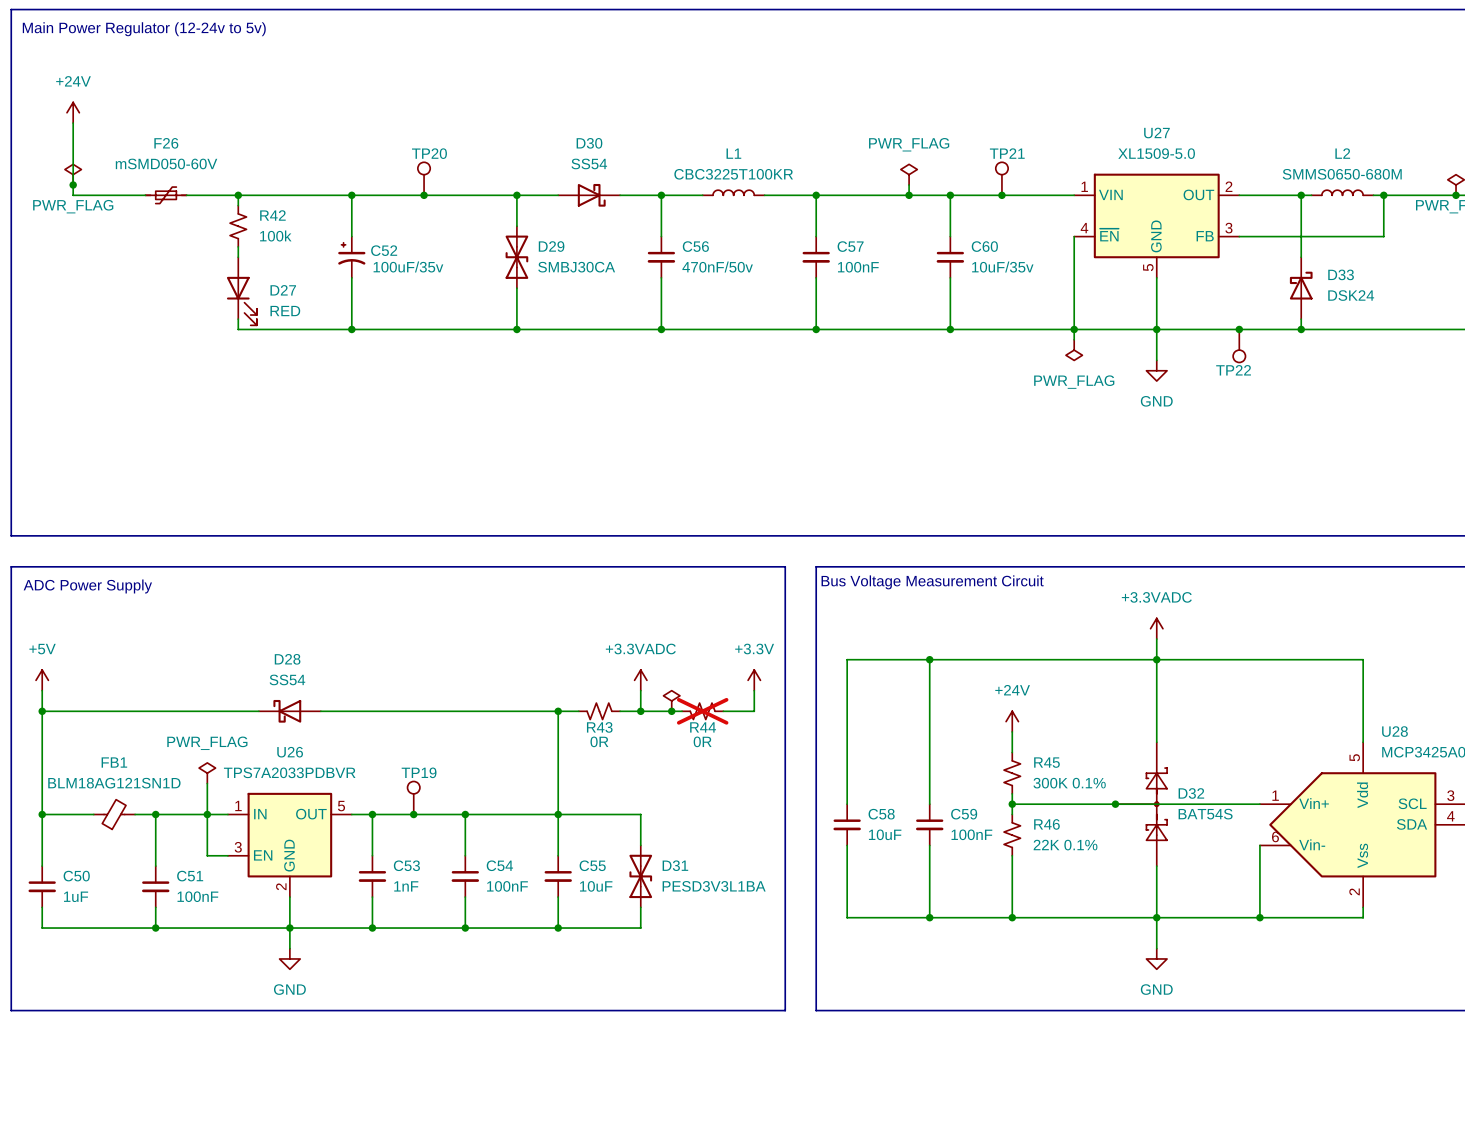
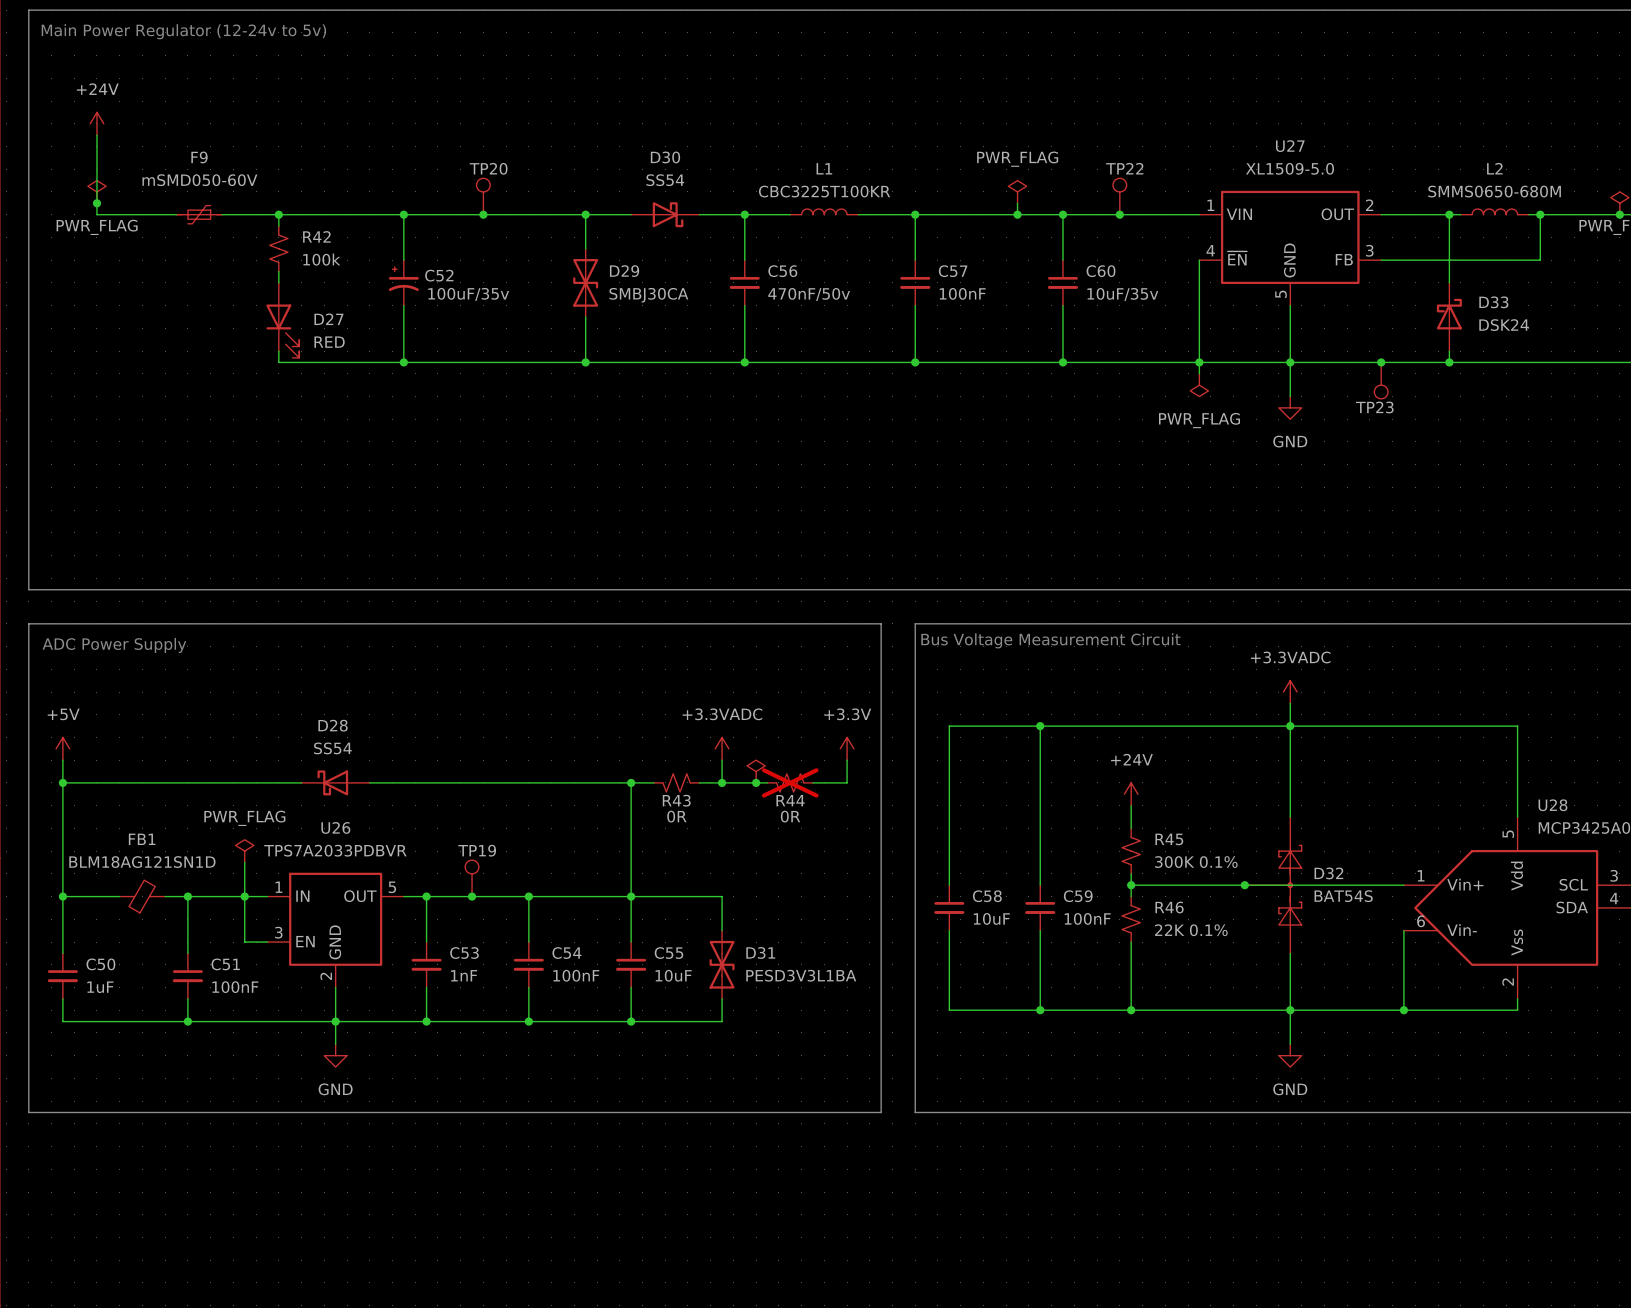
F26 name: F26 (166, 143) -> F9 (199, 157)
TP21 name: TP21 (1007, 153) -> TP22 (1124, 168)
TP22 name: TP22 (1233, 370) -> TP23 (1374, 407)

